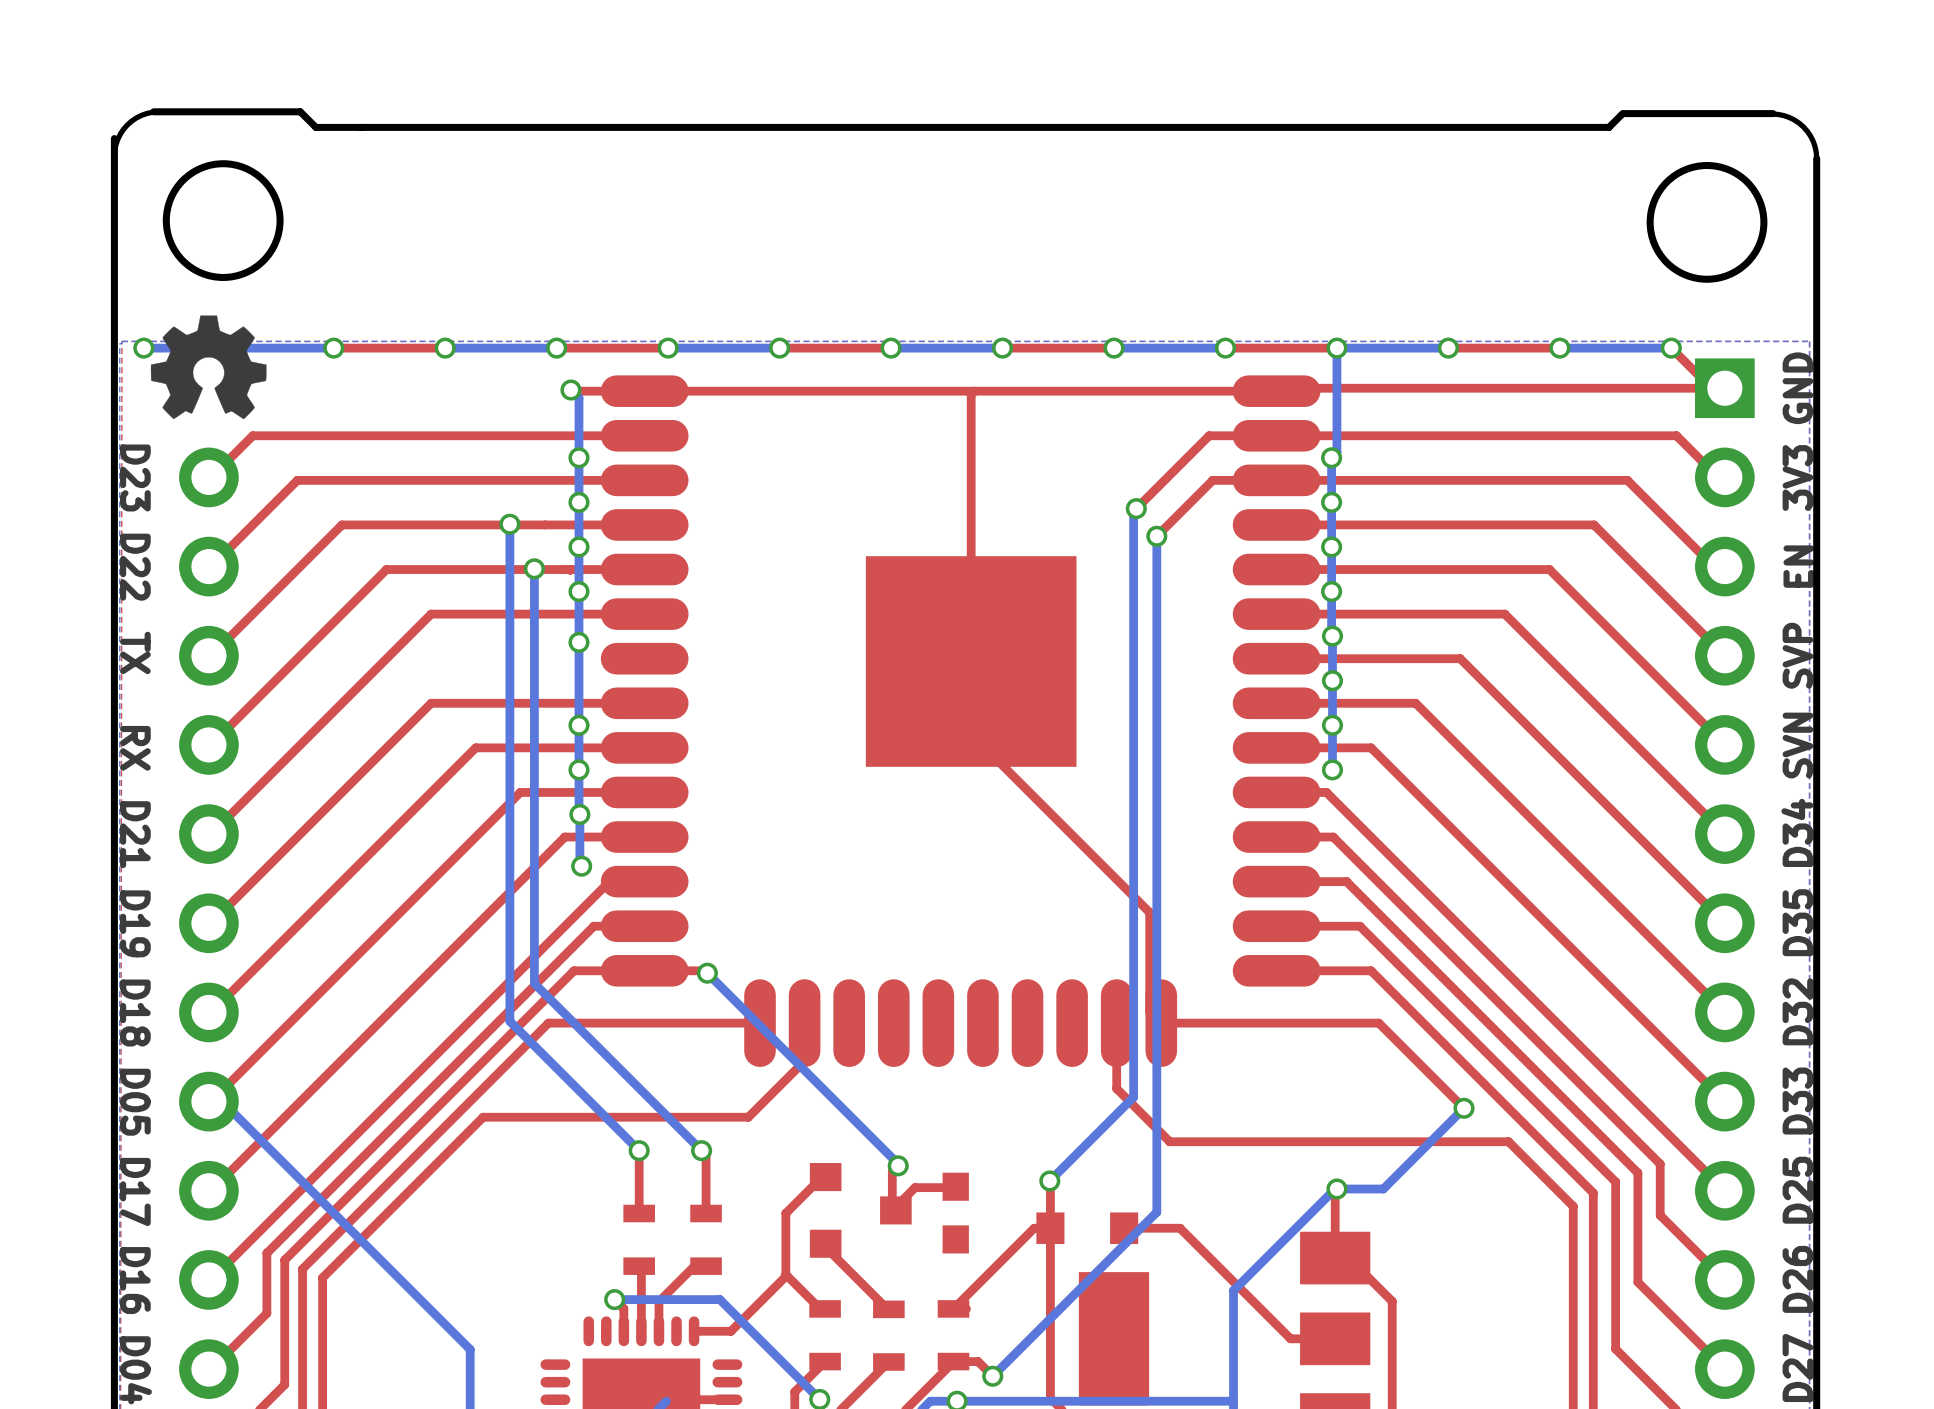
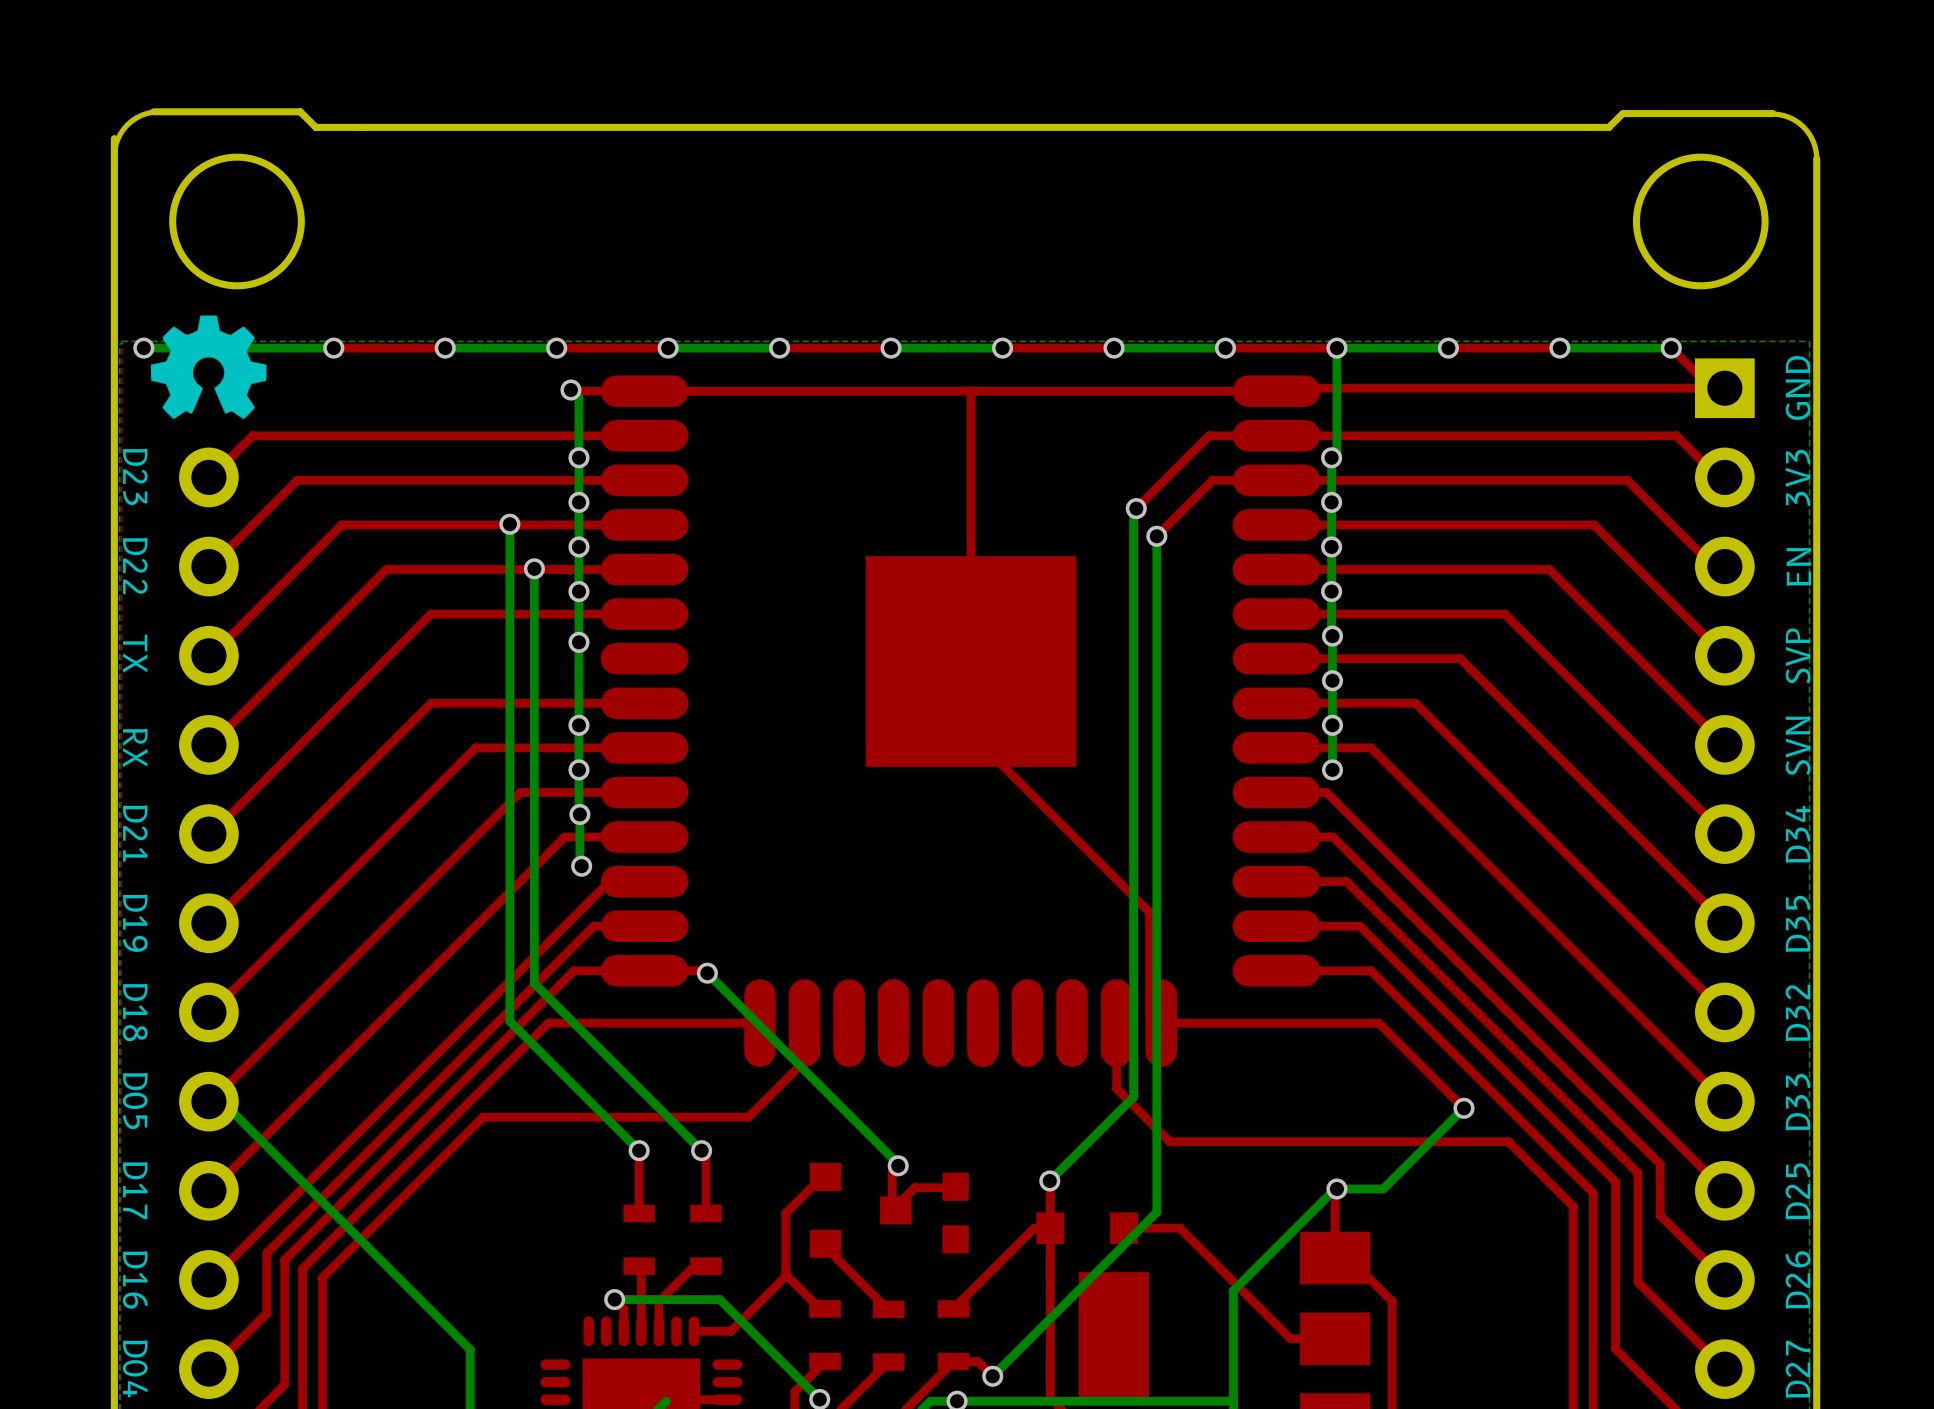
round board edge size: [162, 160, 284, 281] -> [169, 153, 305, 290]
round board edge size: [1646, 161, 1768, 283] -> [1632, 153, 1769, 290]

